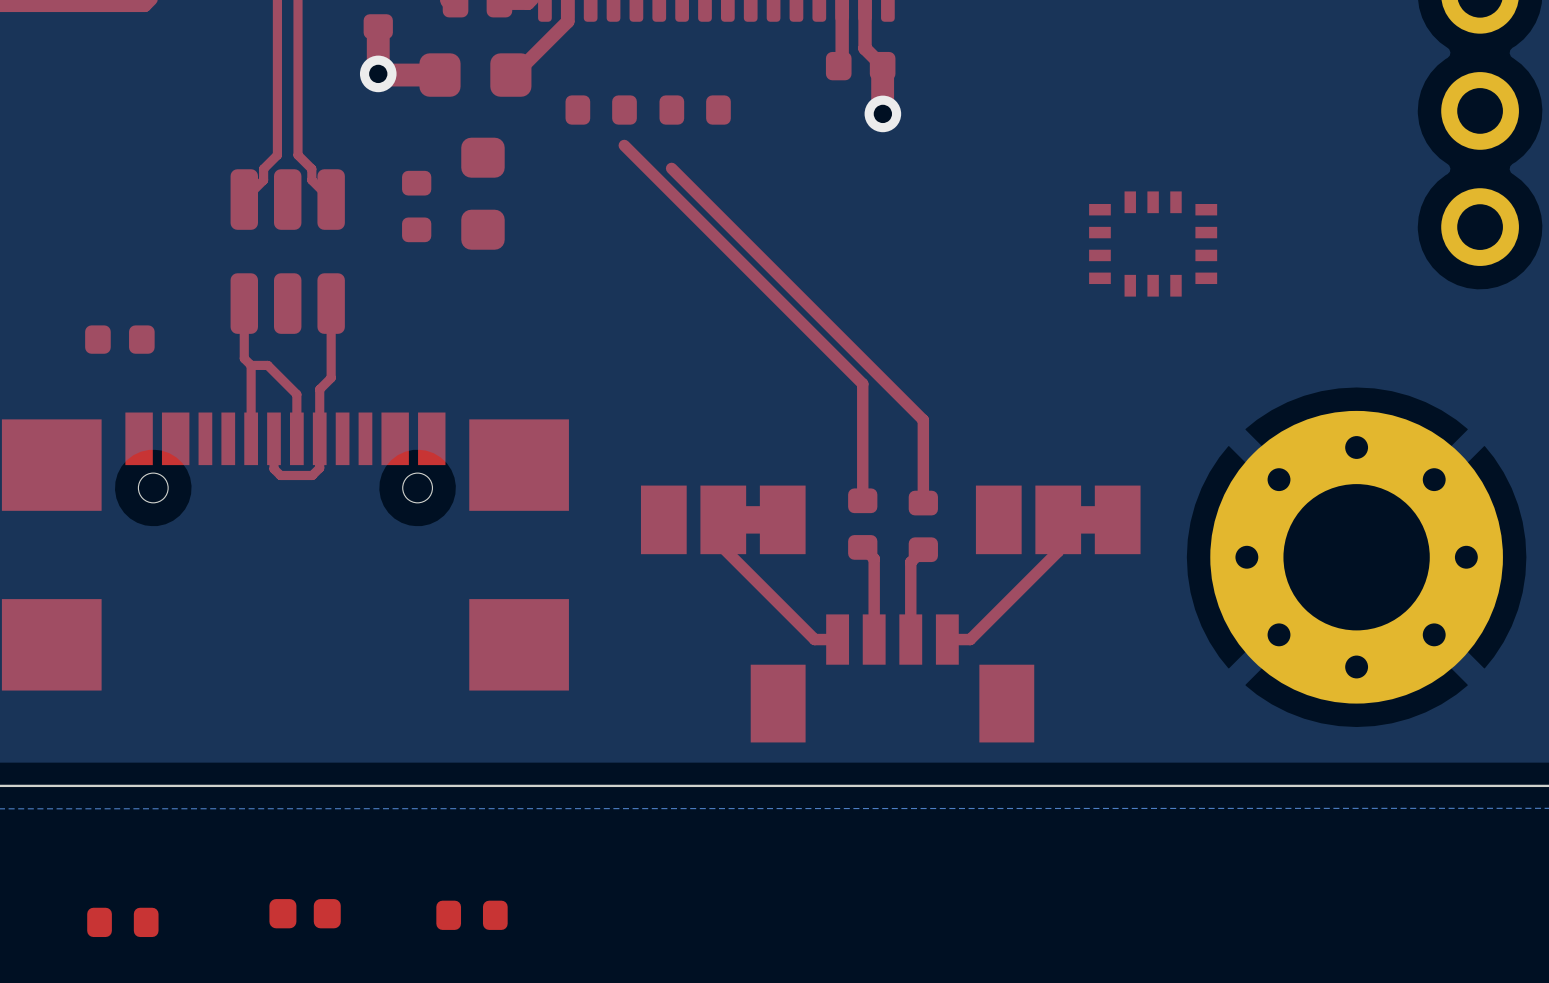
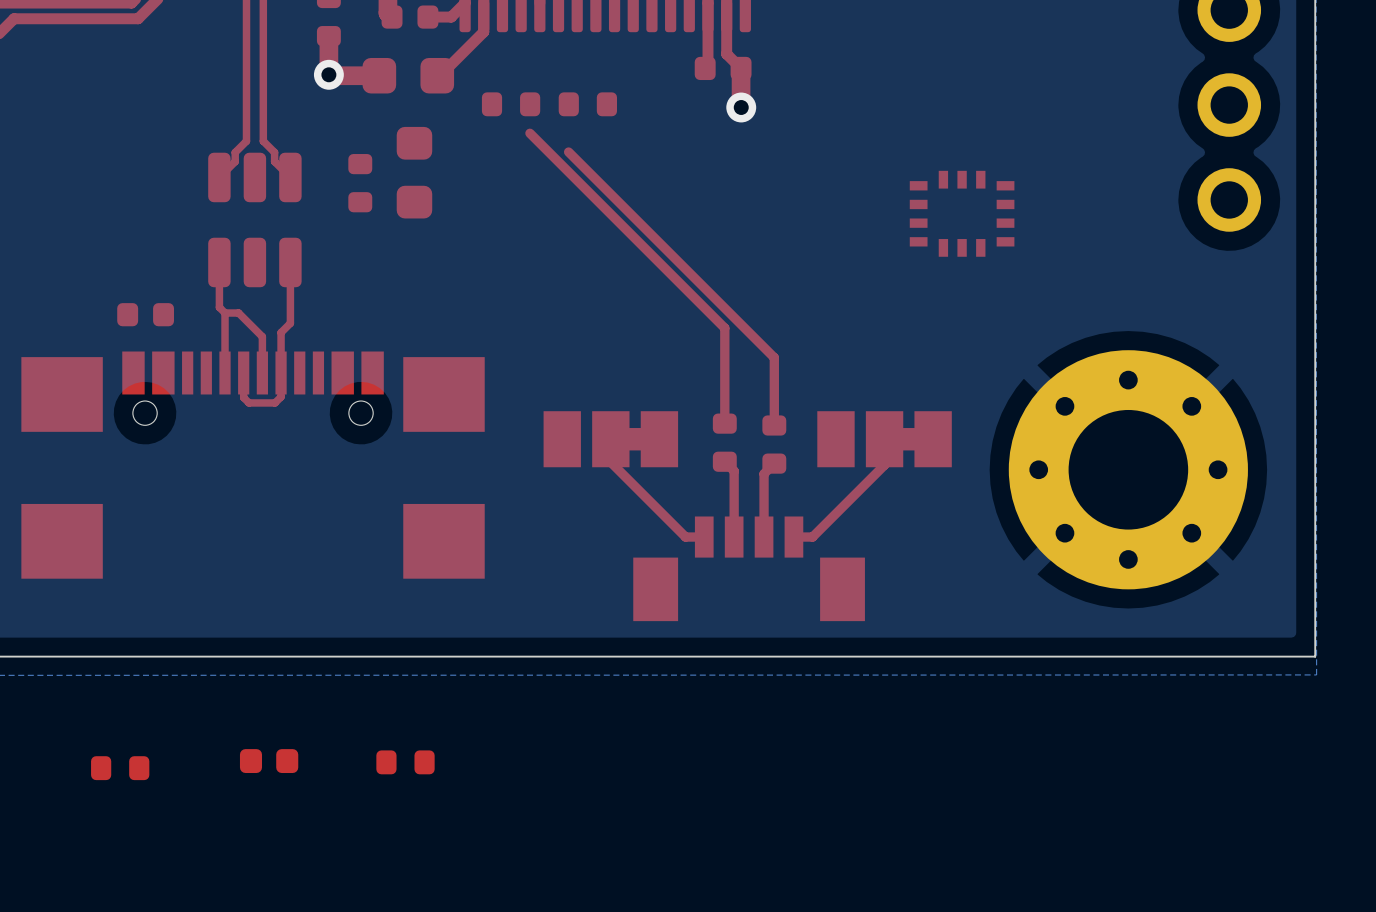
part position: (119, 339) -> (145, 314)

